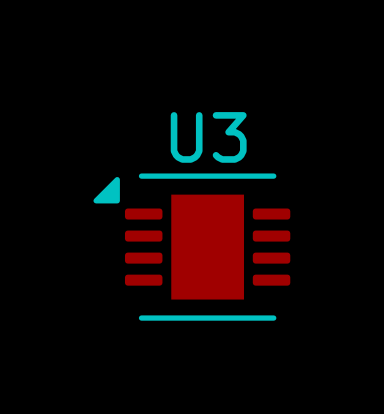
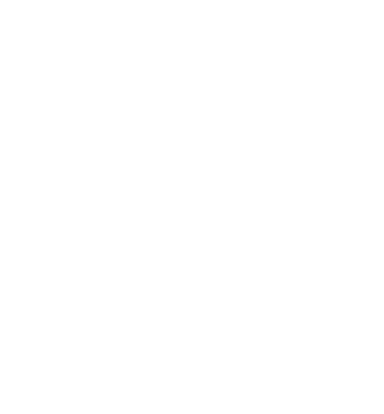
U3: (191, 247) -> none

